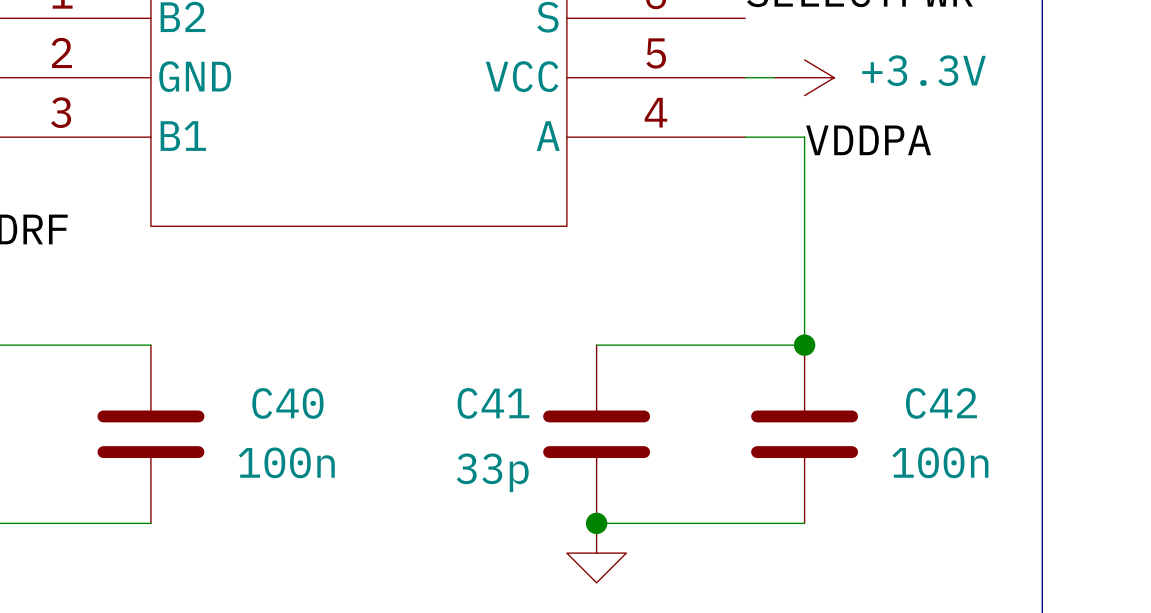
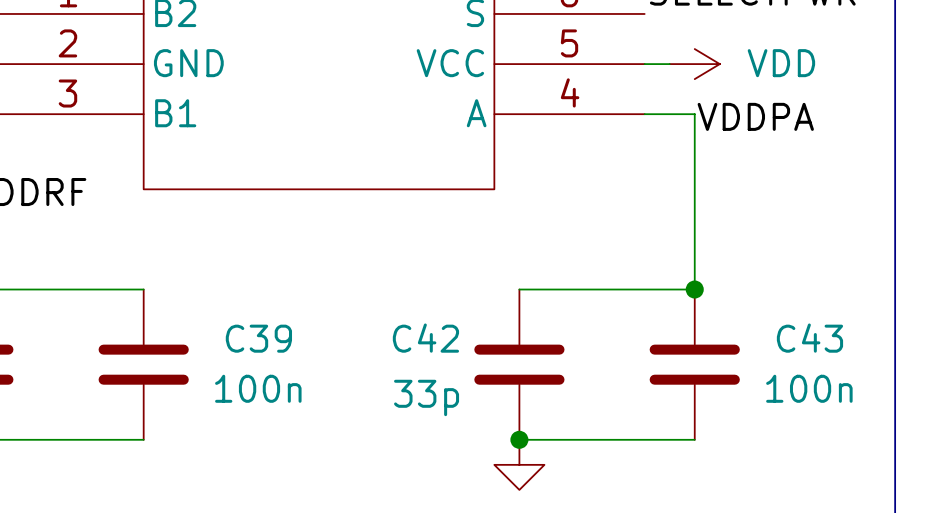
power symbol: +3.3V (804, 77) -> VDD (694, 64)
C40 name: C40 (287, 403) -> C39 (258, 338)
C41 name: C41 (493, 403) -> C42 (425, 338)
C42 name: C42 (941, 403) -> C43 (809, 338)

